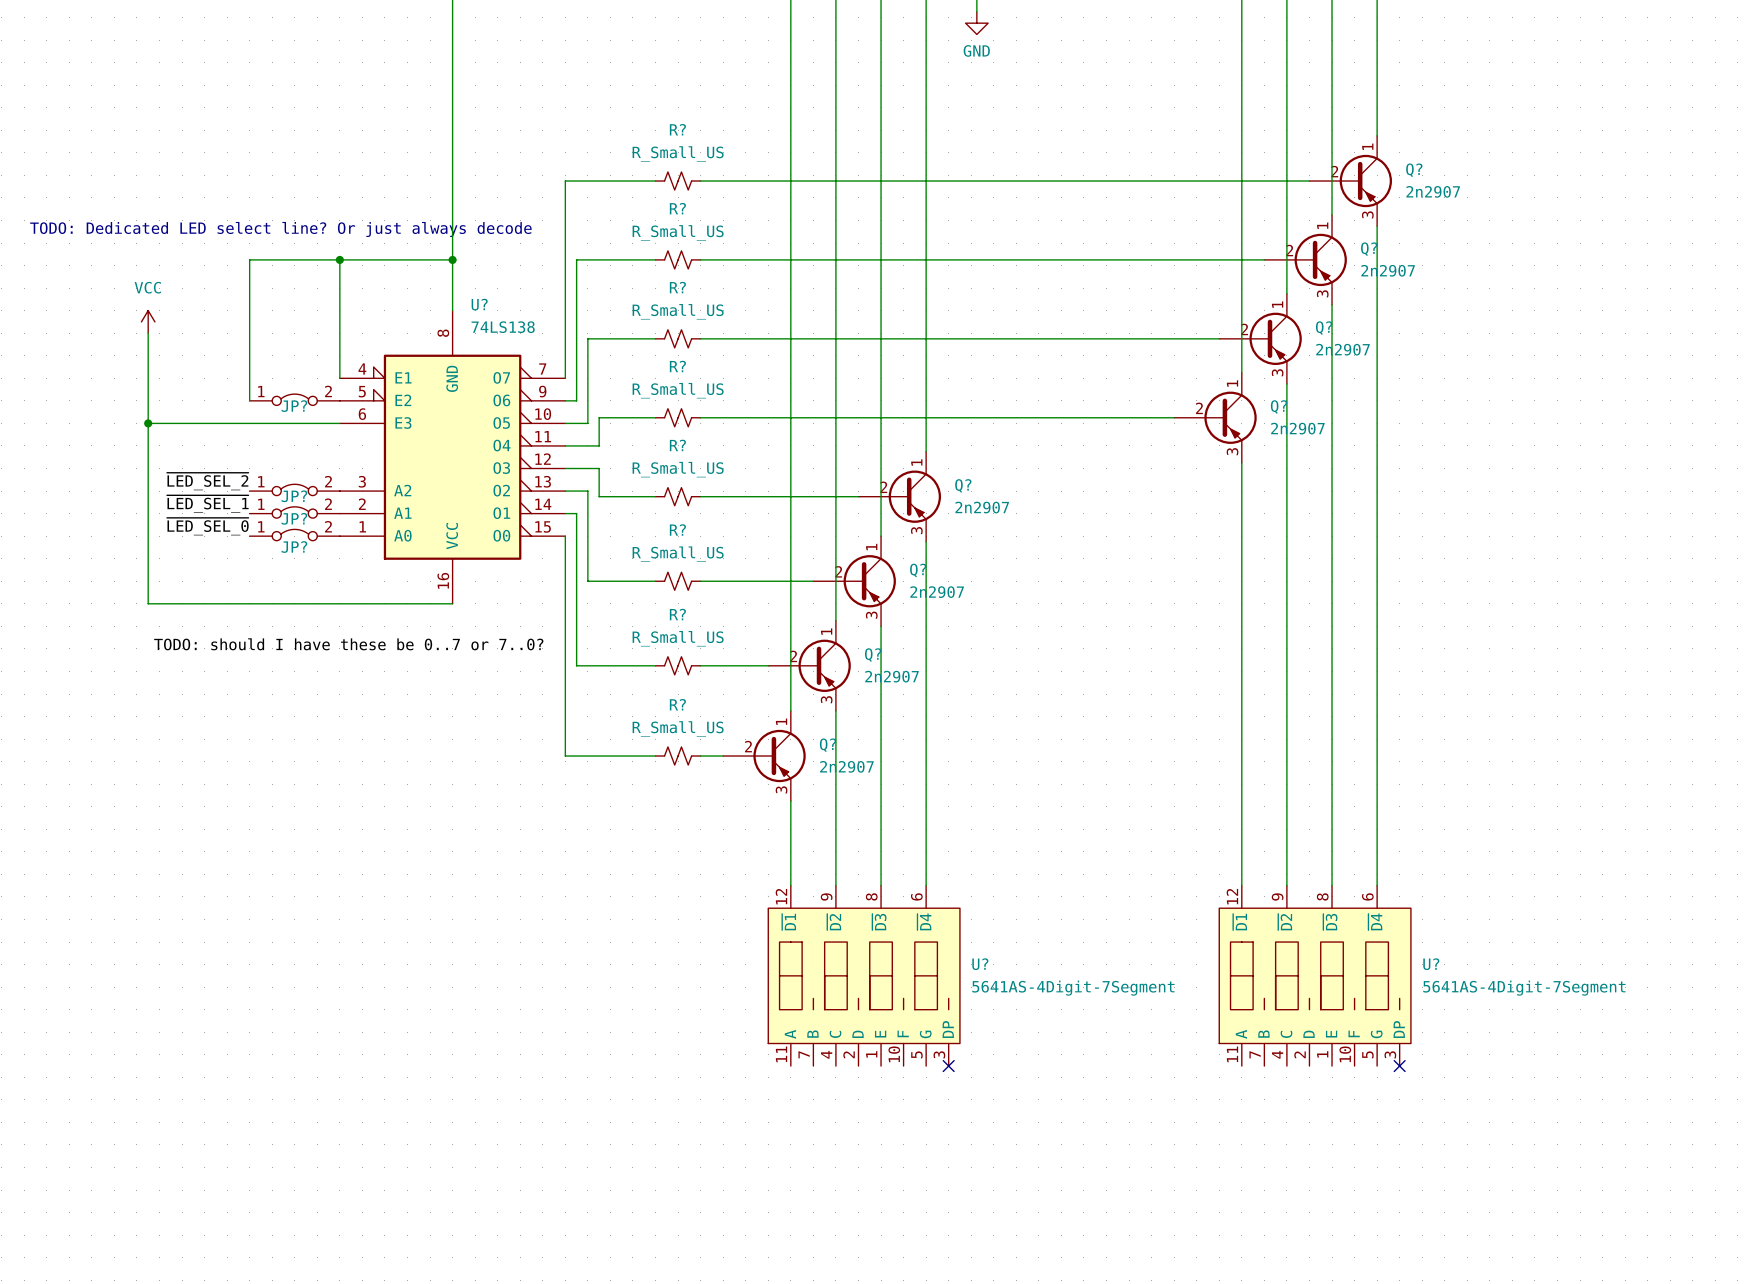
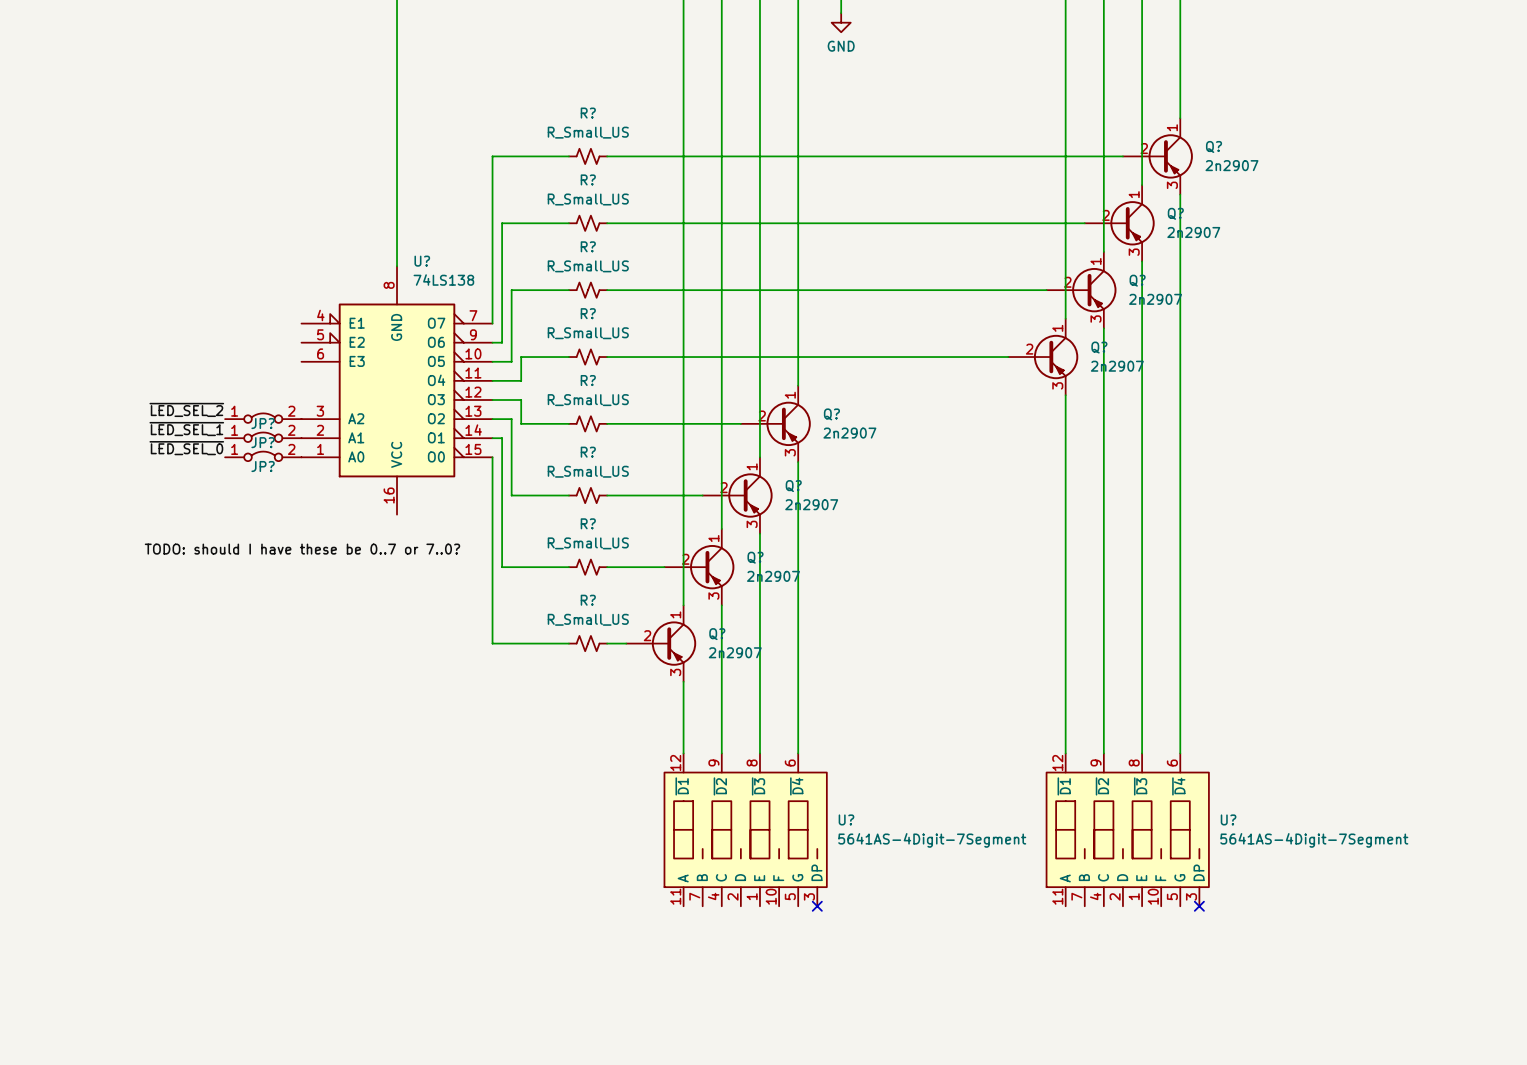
text: TODO: Dedicated LED select line? Or just always decode (280, 229) -> none
wire: (339, 259) (339, 378) -> none
junction: (339, 259) -> none
wire: (452, 259) (249, 259) (249, 400) -> none
junction: (452, 259) -> none
power symbol: VCC (148, 321) -> none
wire: (148, 333) (148, 603) (452, 603) -> none
JP?: (294, 399) -> none
wire: (148, 423) (339, 423) -> none
junction: (148, 423) -> none

